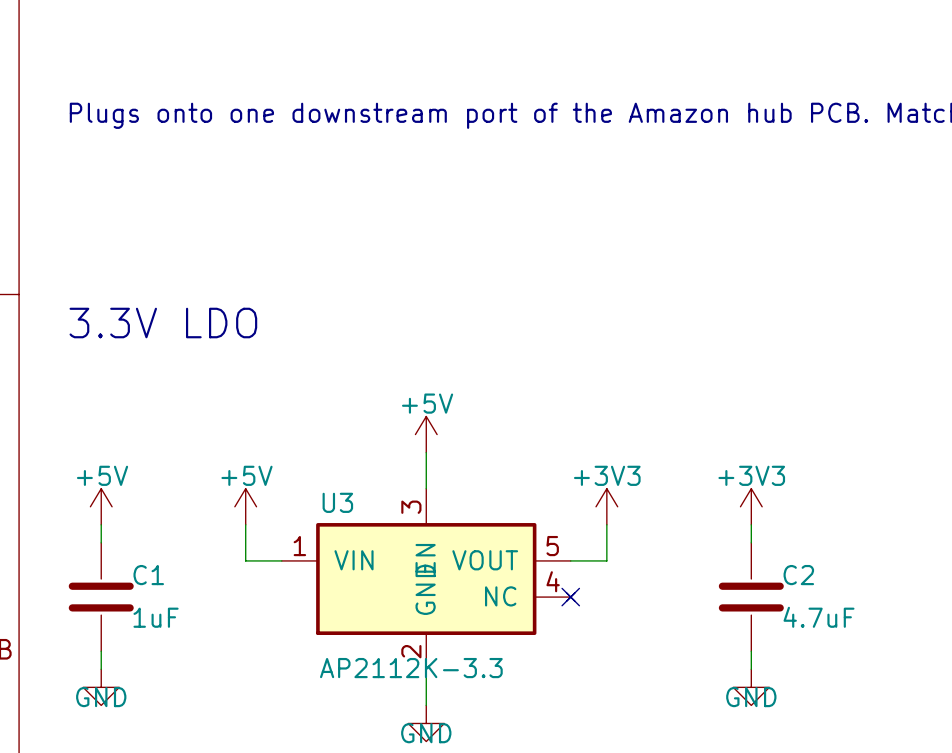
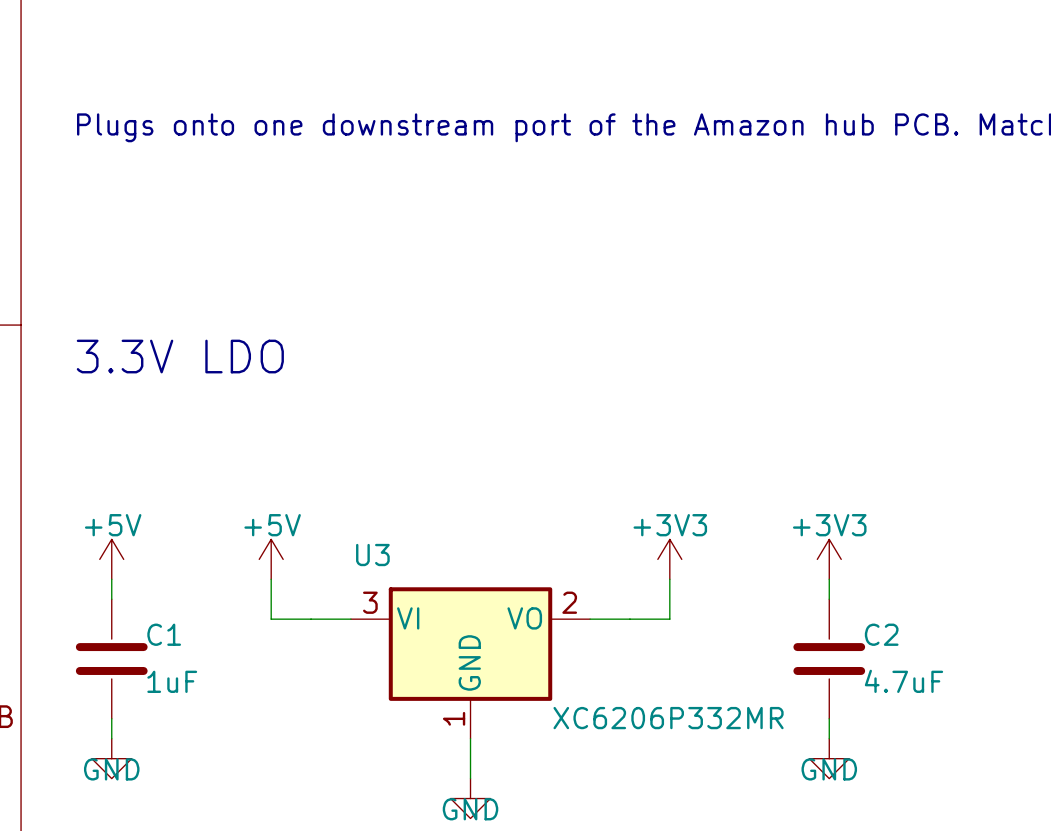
power symbol: +5V (426, 434) -> none
wire: (426, 452) (426, 488) -> none
U3 symbol: [281, 488, 576, 670] -> [350, 587, 591, 739]
no-connect mark: (570, 597) -> none
U3 value: AP2112K-3.3 (411, 668) -> XC6206P332MR (668, 718)

